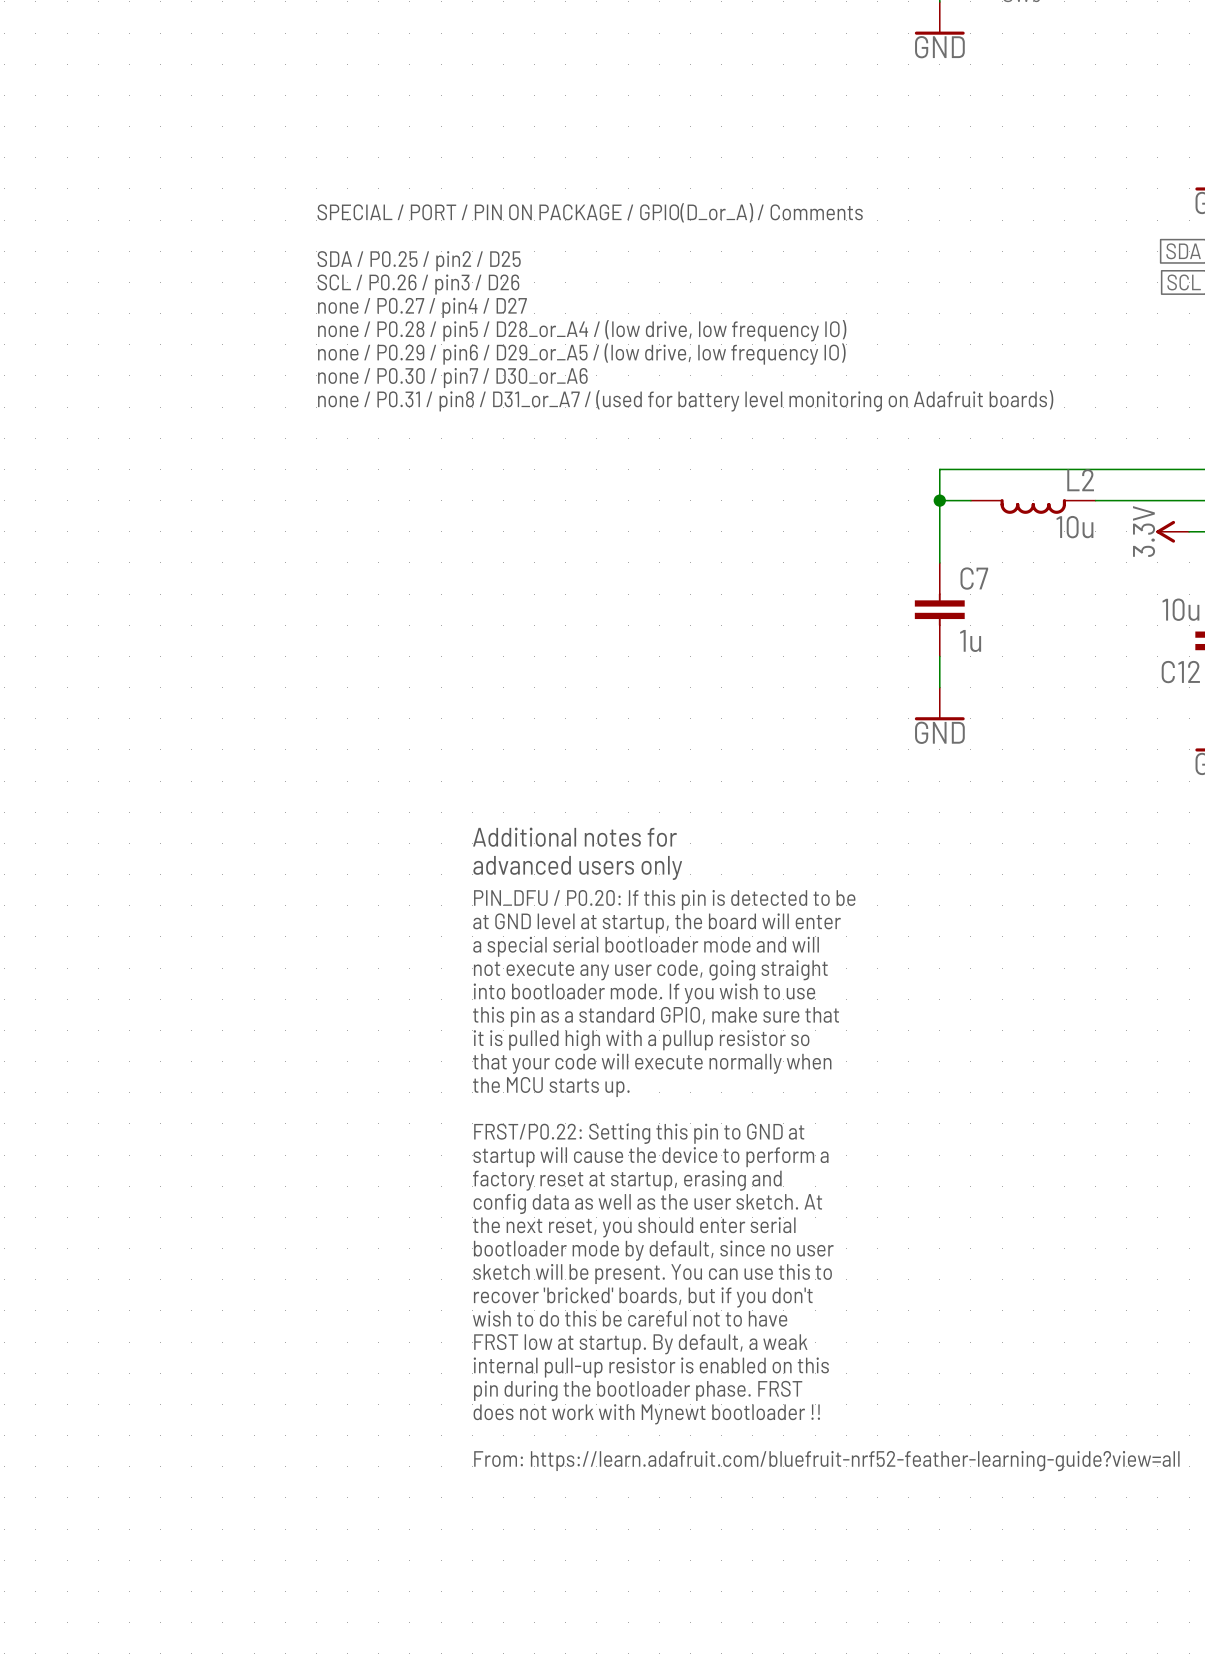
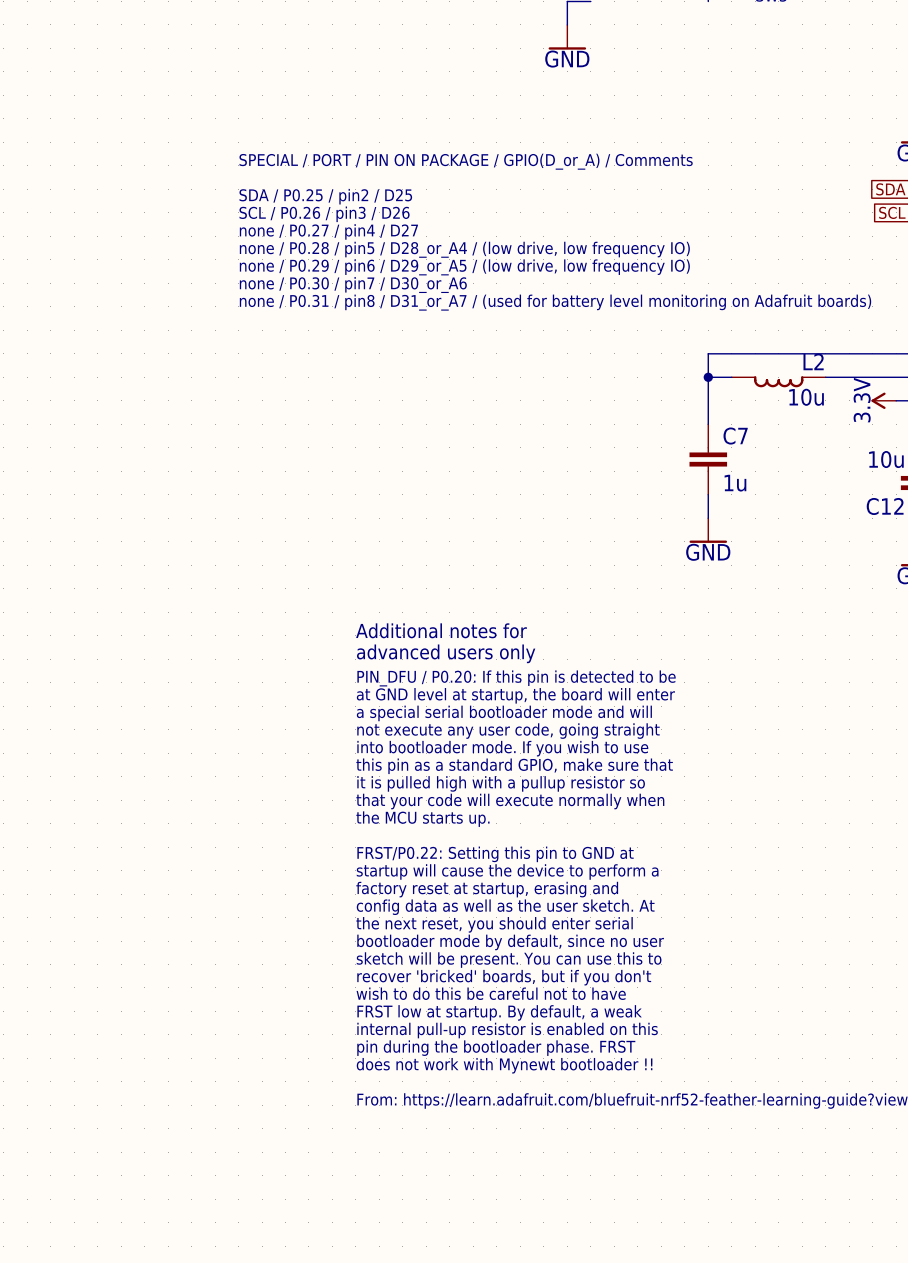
wire: none -> (590, 1) (567, 1) (567, 24)
power symbol: GND (939, 18) -> none
power symbol: none -> GND (567, 37)

